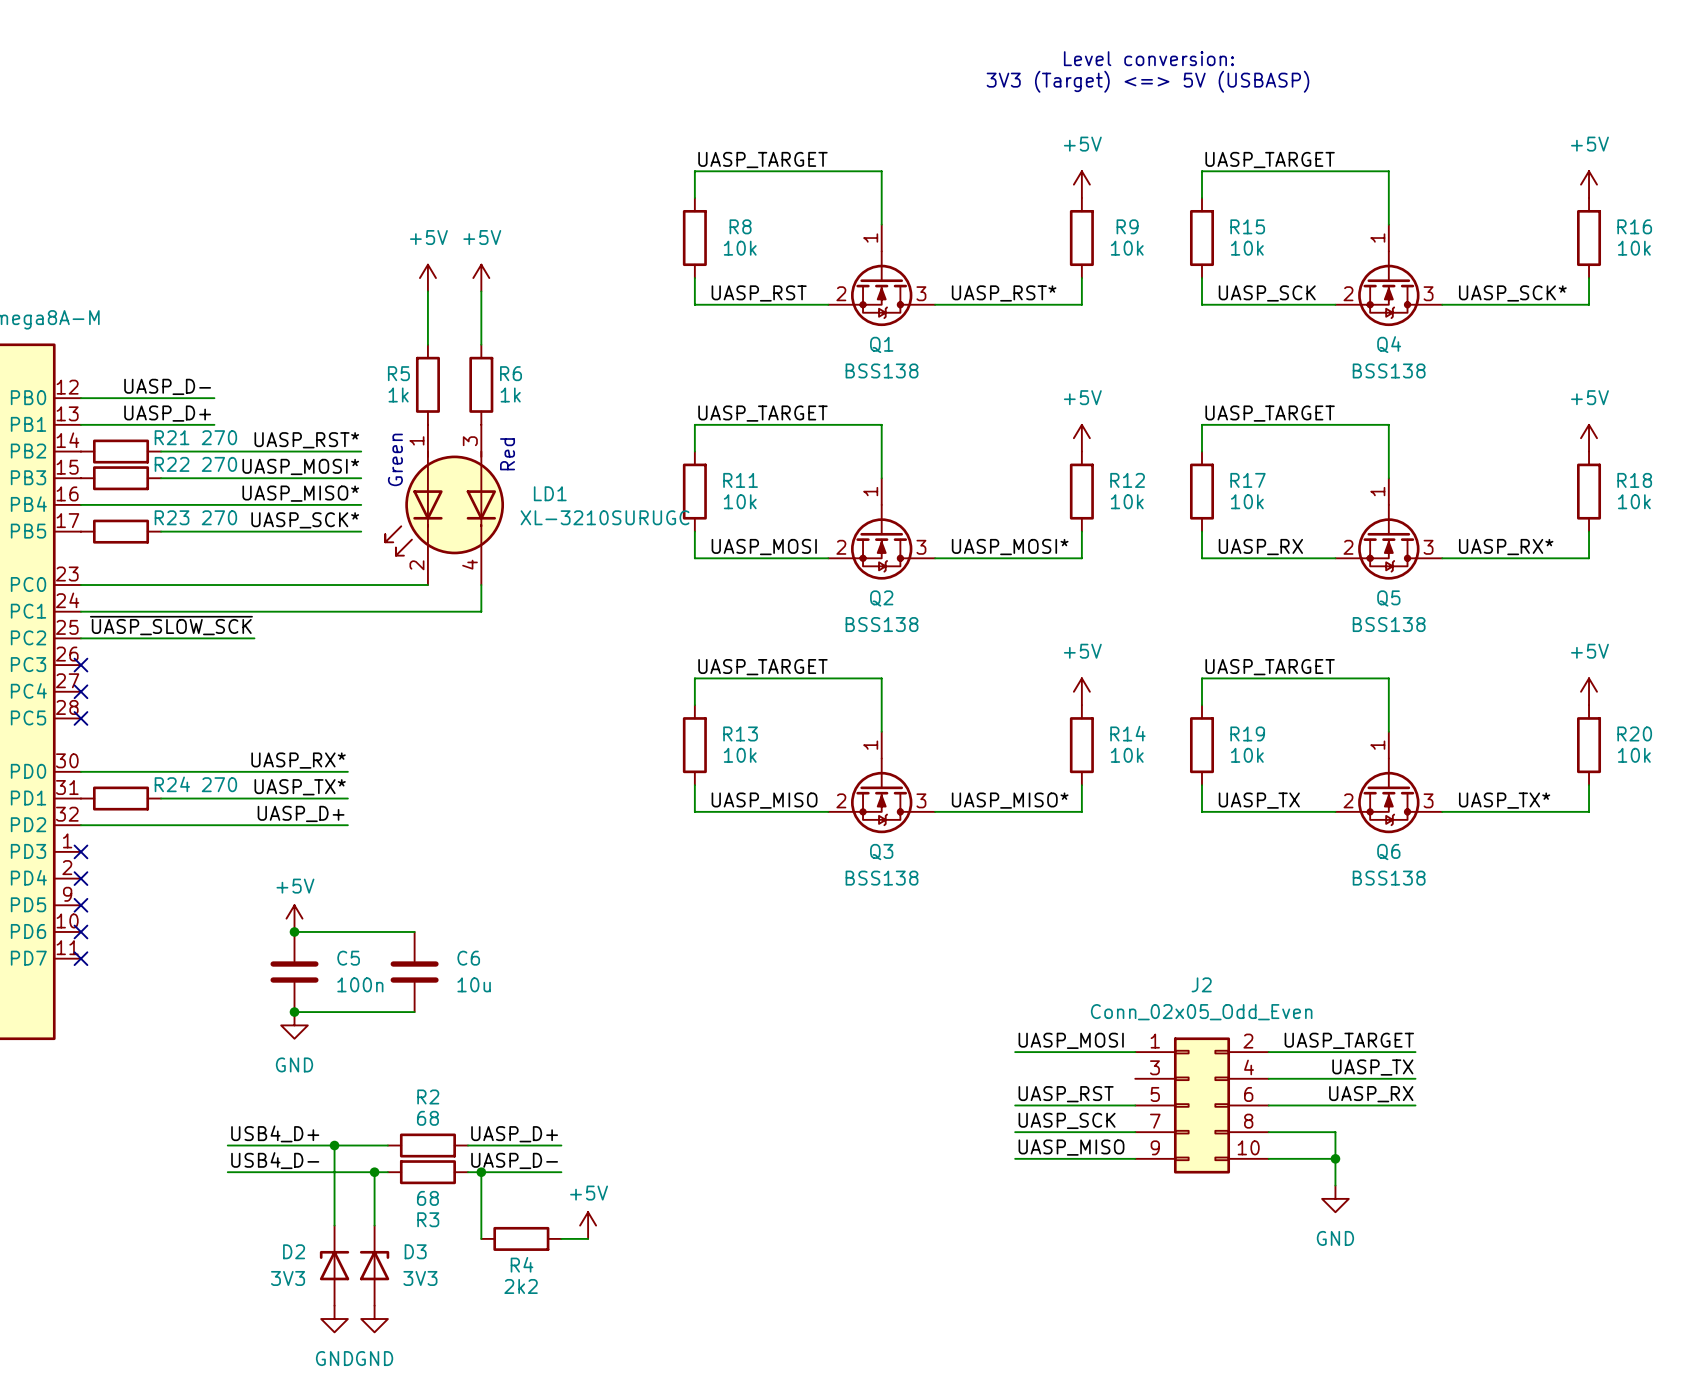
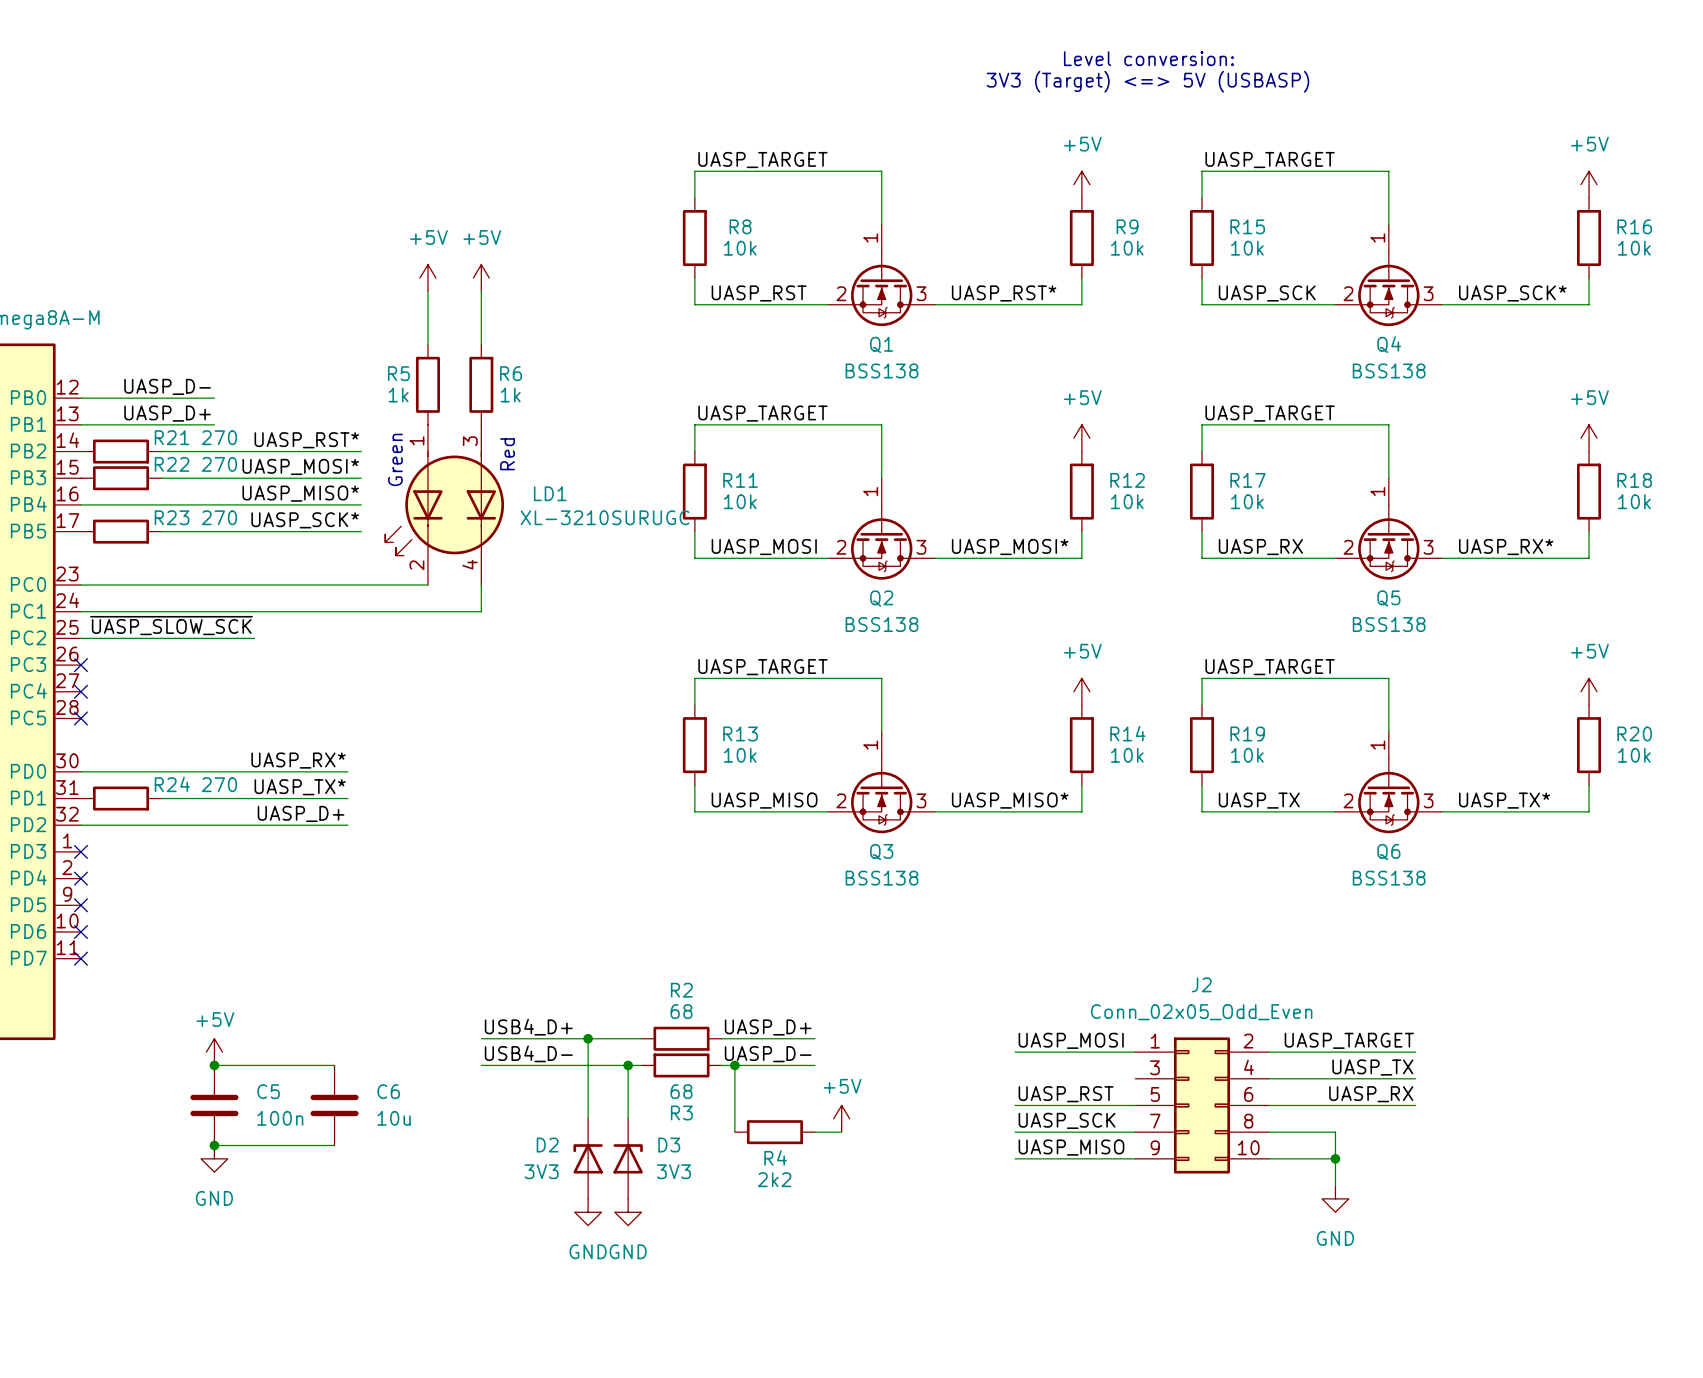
power symbol position: +5V (294, 918) -> +5V (214, 1052)
wire: (294, 931) (414, 931) -> none
junction: (294, 931) -> none
C5 position: (294, 972) -> (214, 1105)
C6 position: (414, 972) -> (334, 1105)
wire: (294, 1012) (414, 1012) -> (214, 1065) (334, 1065)
junction: (294, 1012) -> none
power symbol: GND (294, 1025) -> none
label: none -> USB4_D+ (528, 1027)
label: none -> UASP_D+ (768, 1027)
wire: none -> (481, 1038) (641, 1038)
wire: none -> (588, 1038) (588, 1118)
junction: none -> (588, 1038)
wire: none -> (721, 1038) (814, 1038)
label: none -> USB4_D- (528, 1053)
label: none -> UASP_D- (768, 1054)
junction: none -> (214, 1065)
wire: none -> (481, 1065) (641, 1065)
wire: none -> (628, 1065) (628, 1118)
junction: none -> (628, 1065)
wire: none -> (721, 1065) (814, 1065)
wire: none -> (734, 1065) (734, 1132)
junction: none -> (734, 1065)
power symbol: none -> +5V (841, 1118)
wire: none -> (814, 1132) (841, 1132)
label: USB4_D+ (275, 1133) -> none
label: UASP_D+ (514, 1134) -> none
wire: none -> (214, 1145) (227, 1145)
junction: none -> (214, 1145)
junction: (334, 1145) -> none
wire: (387, 1145) (334, 1145) (334, 1225) -> none
R2 position: (427, 1145) -> (681, 1038)
wire: (467, 1145) (561, 1145) -> none
power symbol: none -> GND (214, 1158)
label: USB4_D- (275, 1160) -> none
label: UASP_D- (514, 1160) -> none
wire: (227, 1172) (387, 1172) -> none
wire: (374, 1172) (374, 1225) -> none
junction: (374, 1172) -> none
R3 position: (427, 1172) -> (681, 1065)
wire: (467, 1172) (561, 1172) -> none
wire: (481, 1172) (481, 1238) -> none
junction: (481, 1172) -> none
power symbol: none -> GND (588, 1212)
power symbol: none -> GND (628, 1212)
power symbol: +5V (588, 1225) -> none
R4 position: (521, 1238) -> (774, 1132)
wire: (561, 1238) (588, 1238) -> none
D2 position: (334, 1265) -> (588, 1158)
D3 position: (374, 1265) -> (628, 1158)
power symbol: GND (334, 1319) -> none
power symbol: GND (374, 1319) -> none

